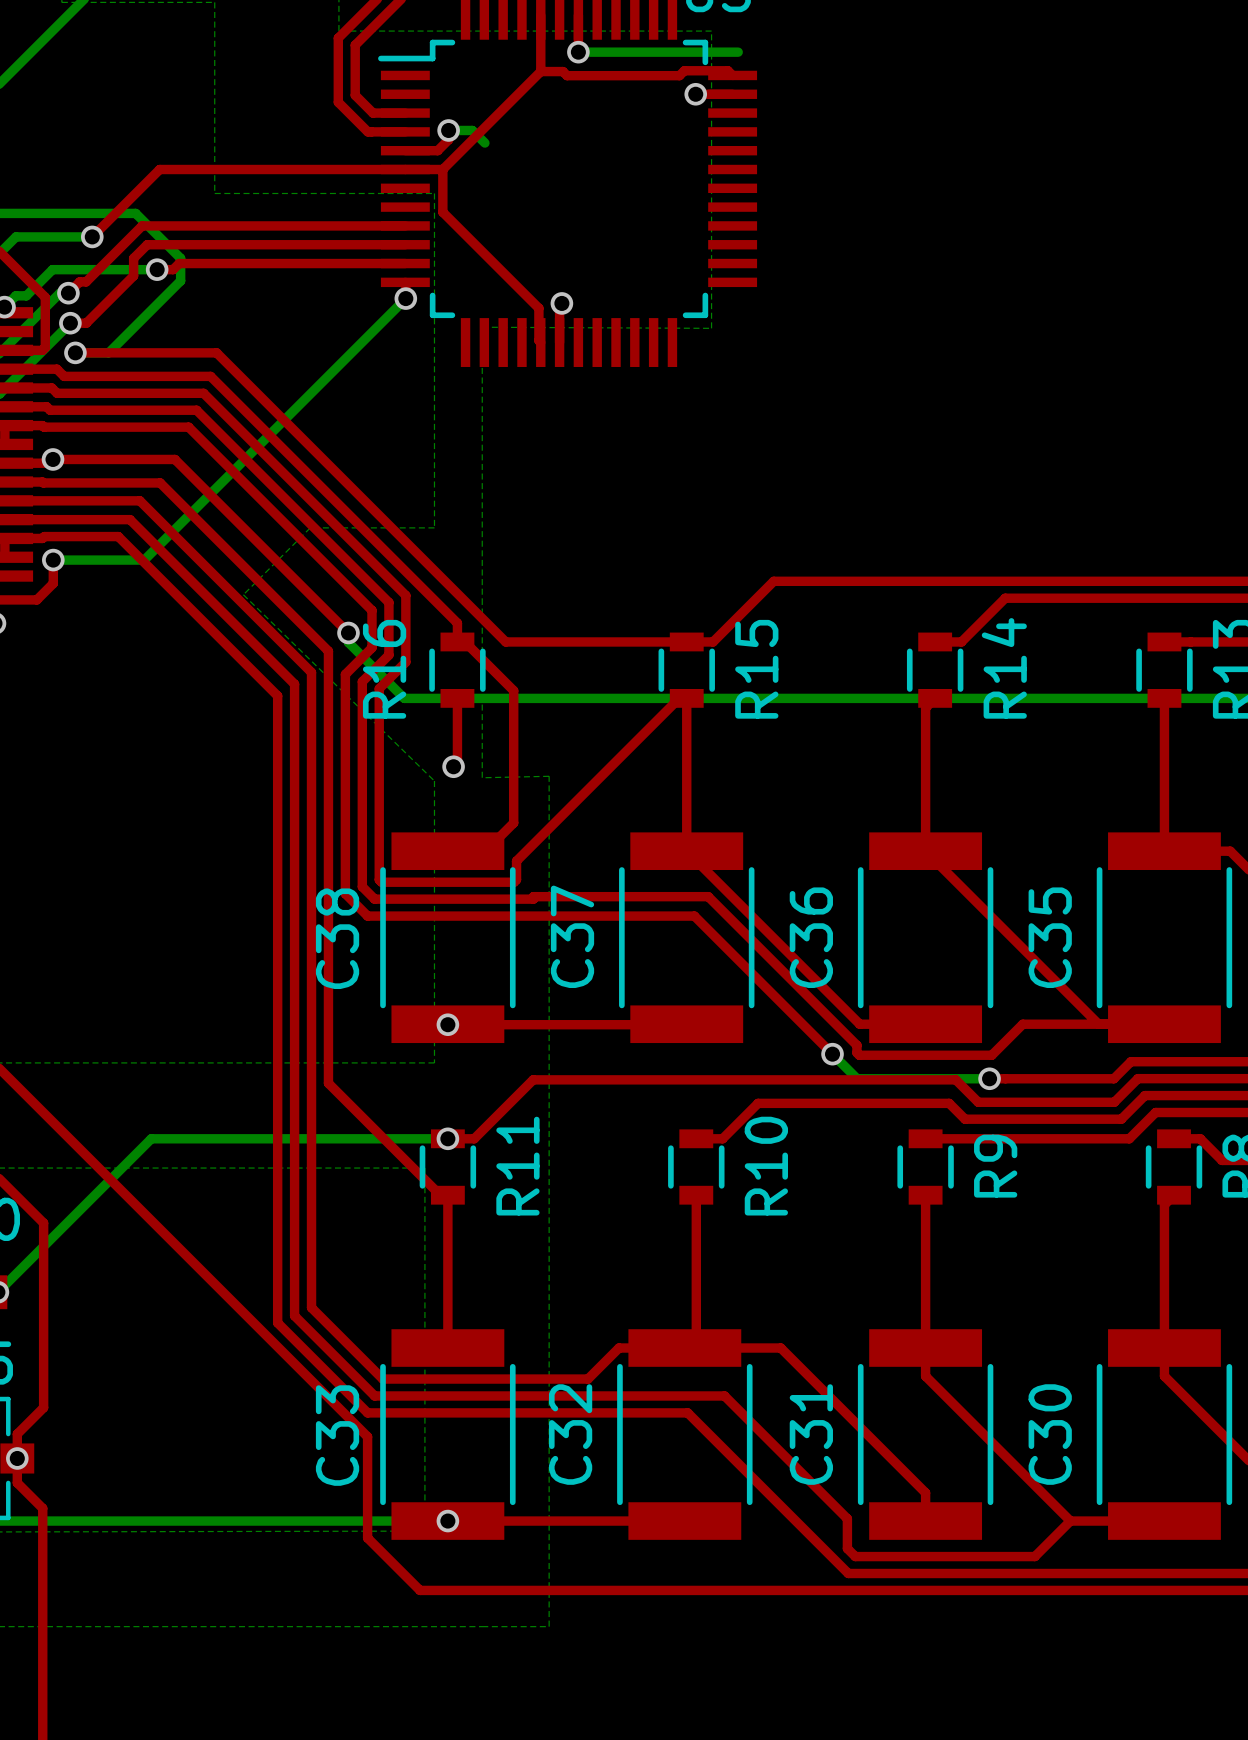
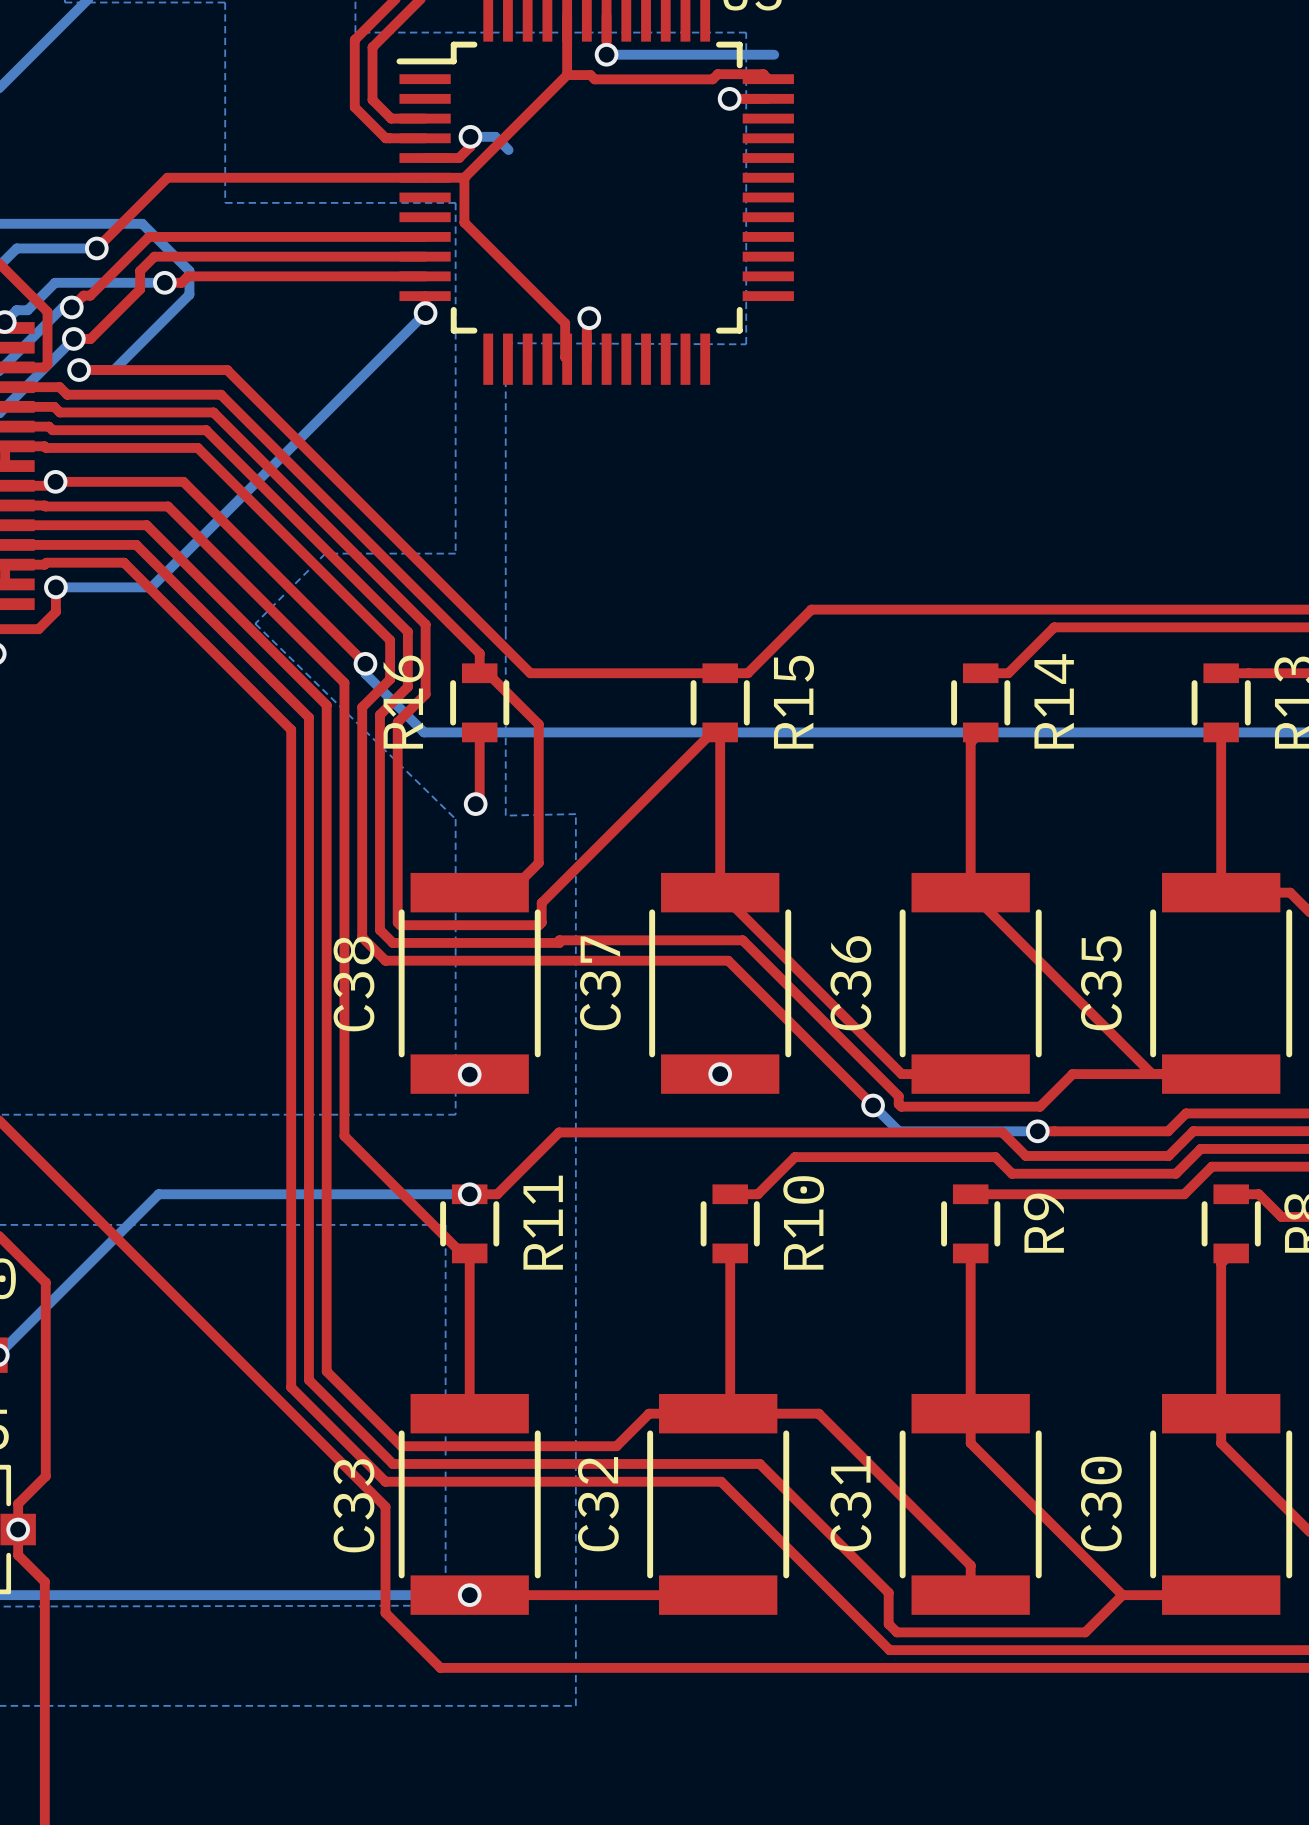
top track: (447, 1024) (686, 1024) -> none
via: none -> (720, 1074)

